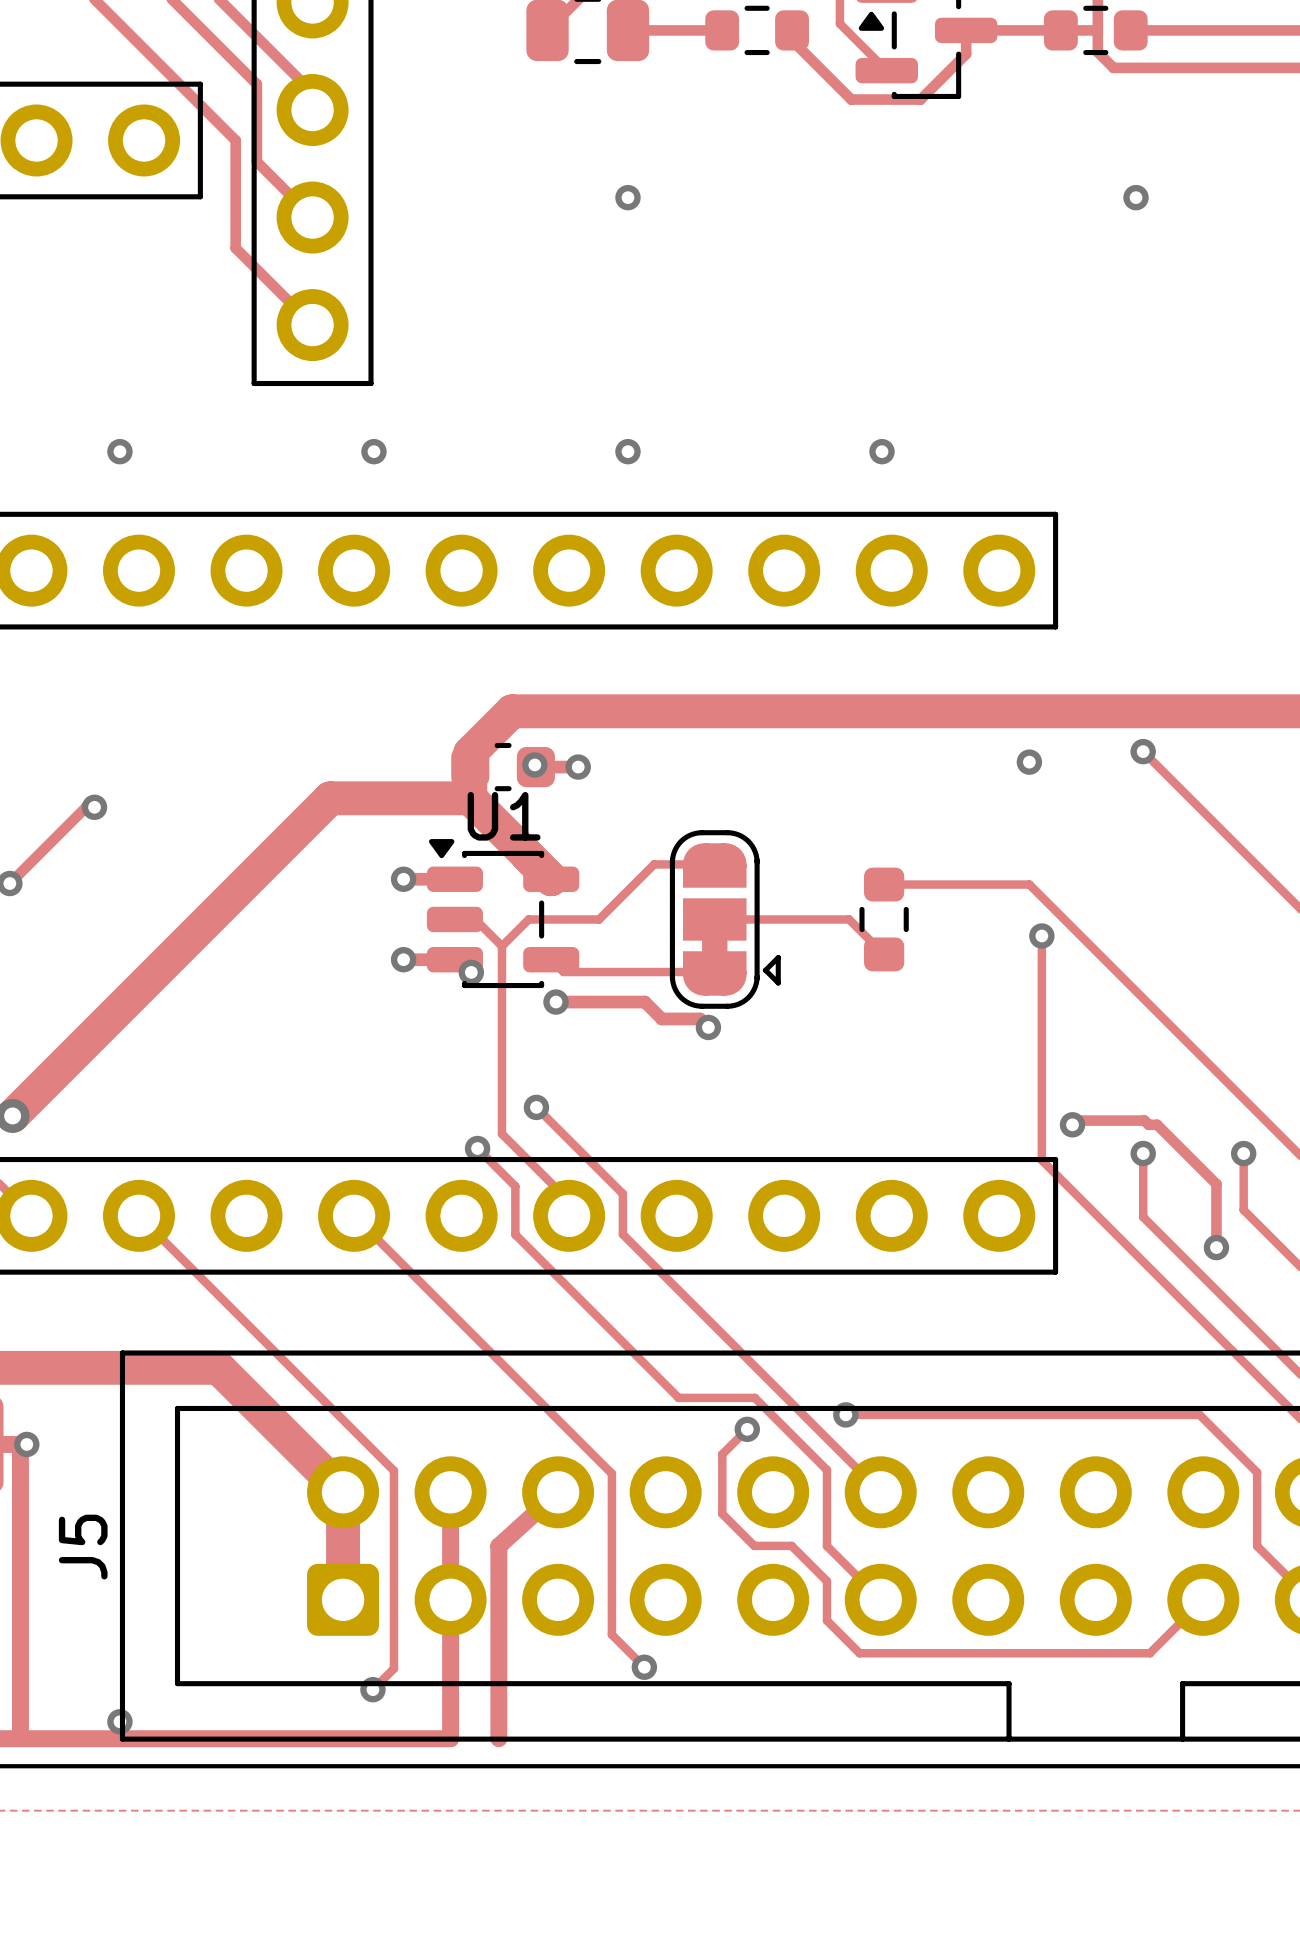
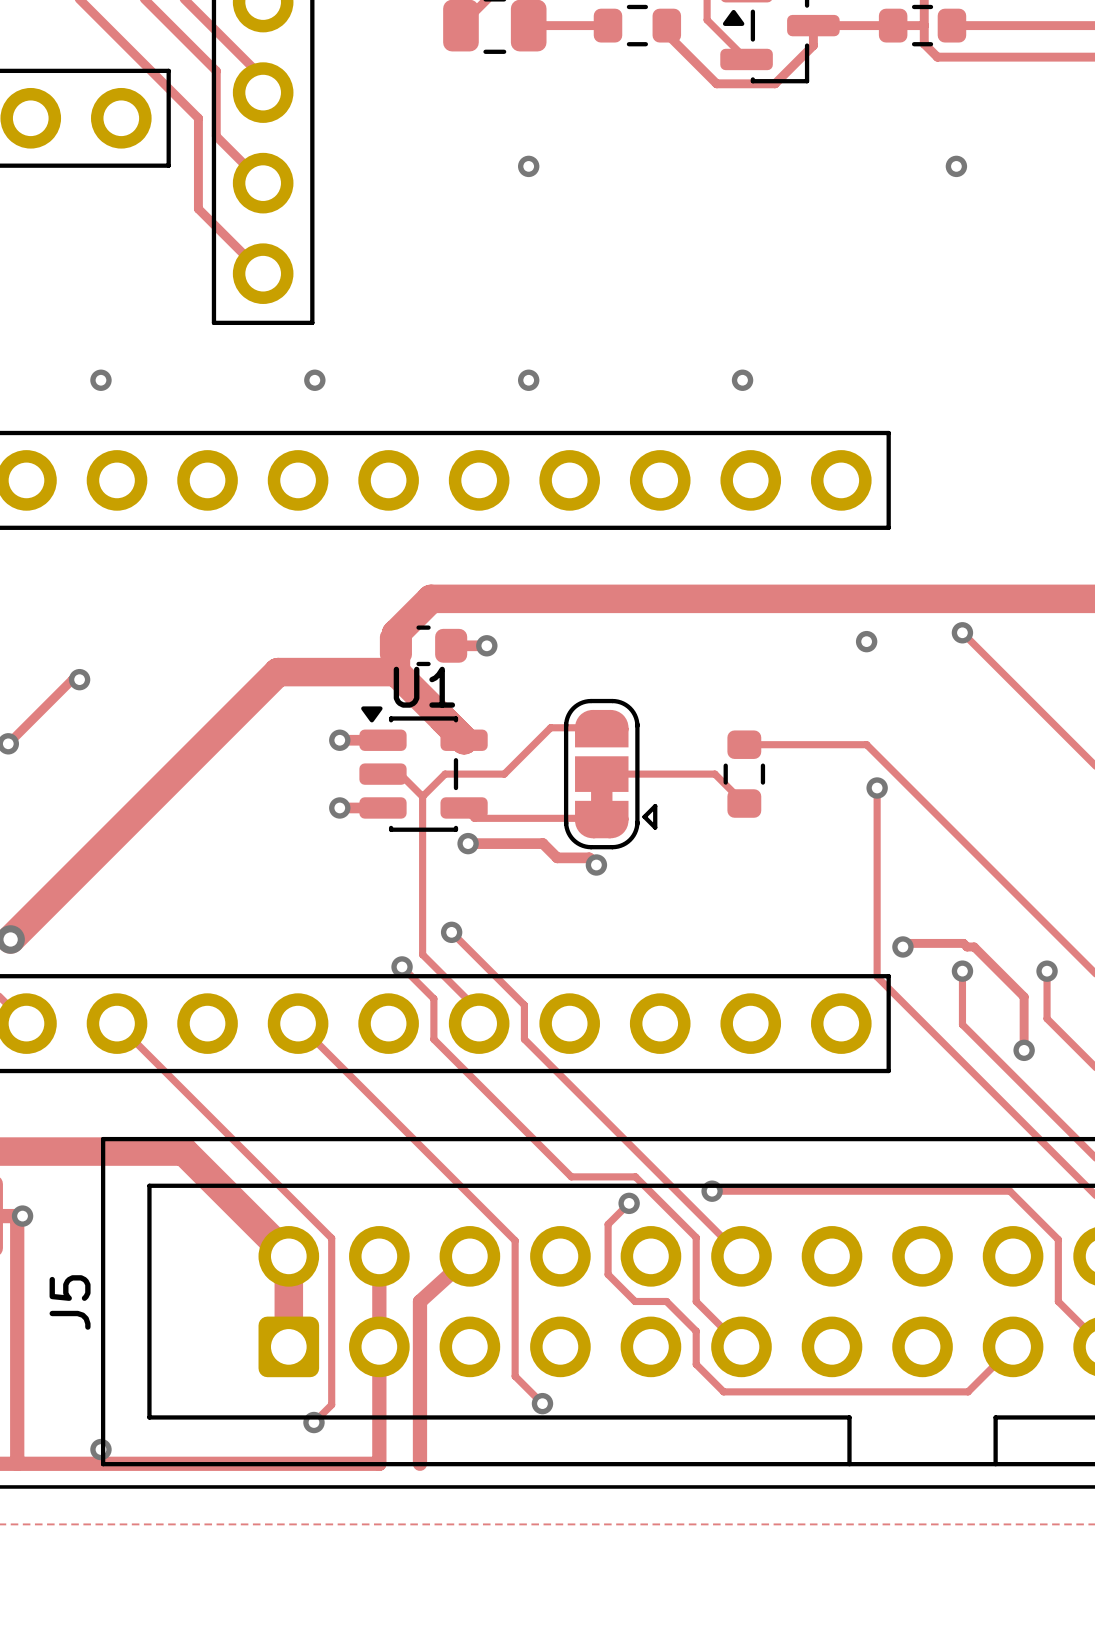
via: (534, 764) -> none
via: (471, 972) -> none

